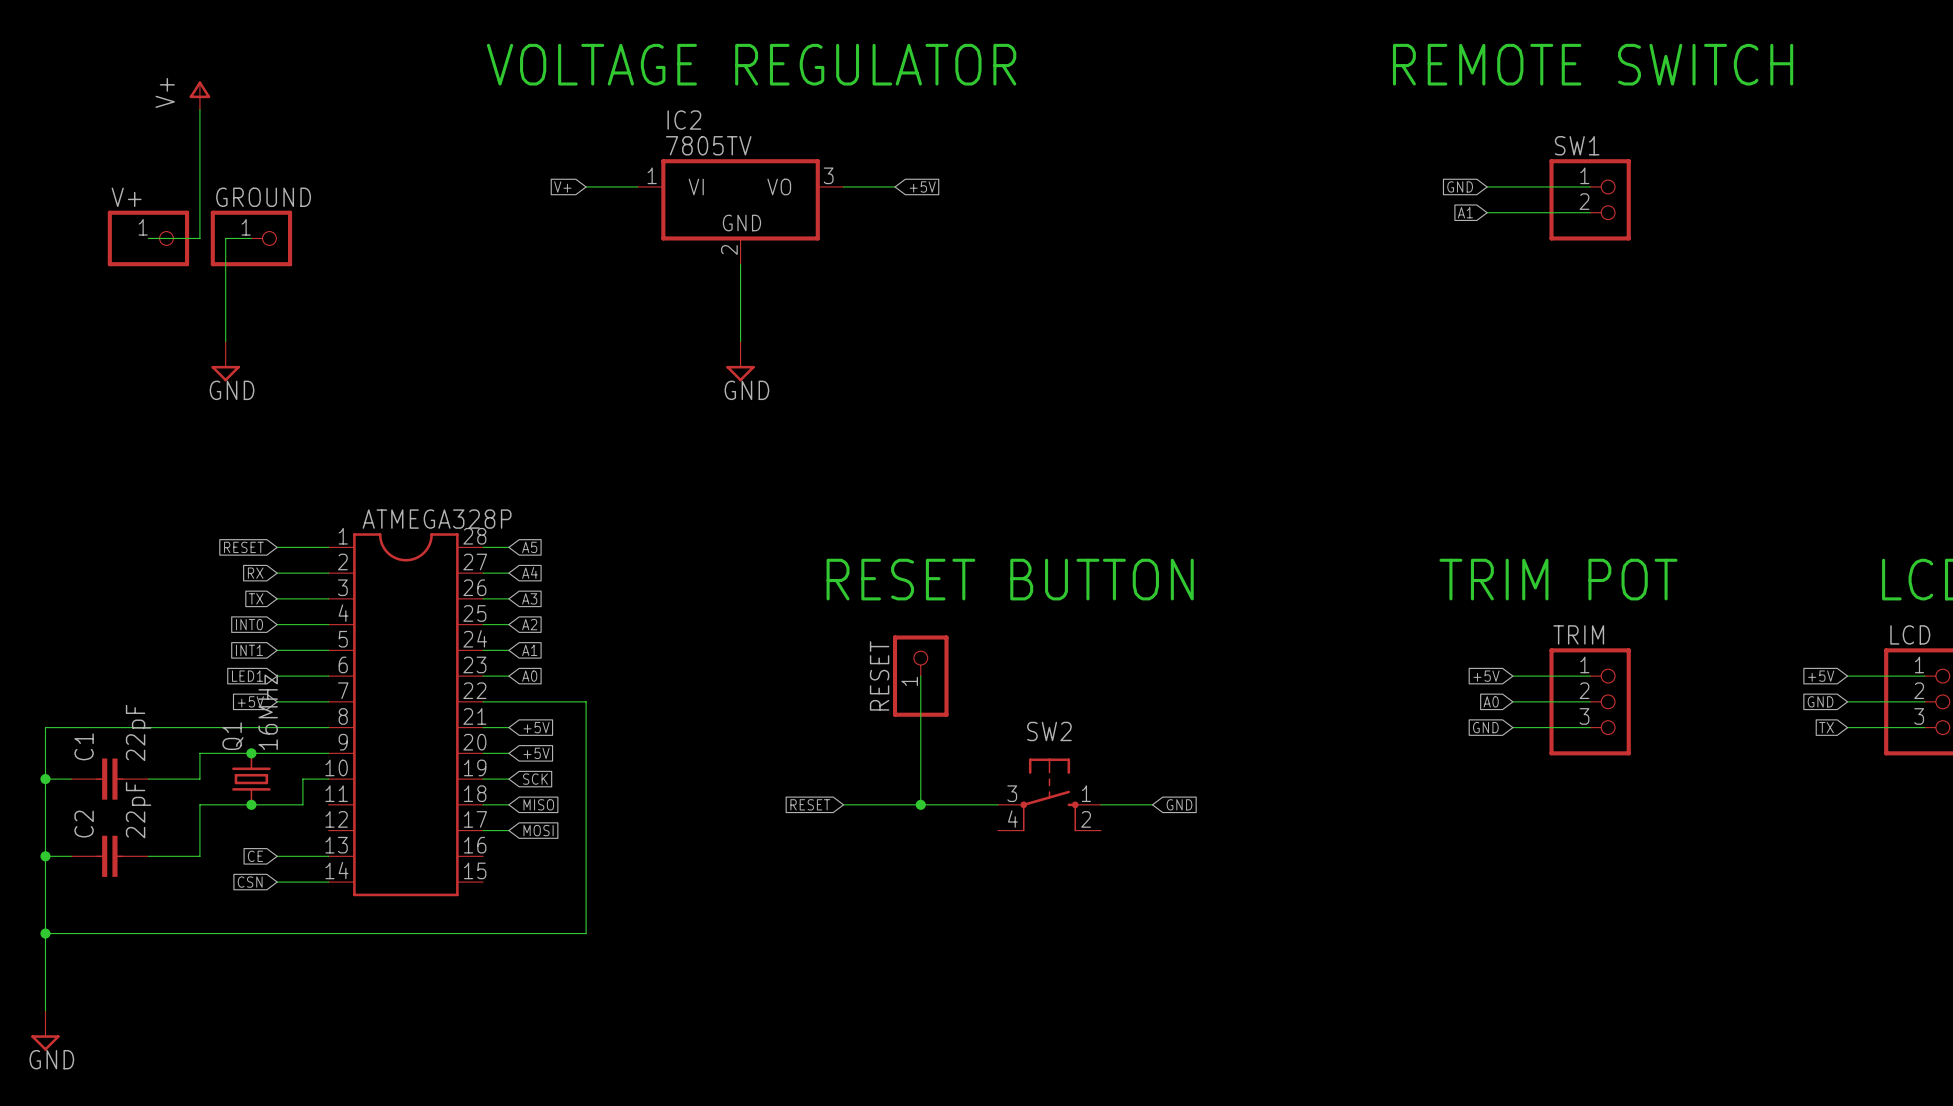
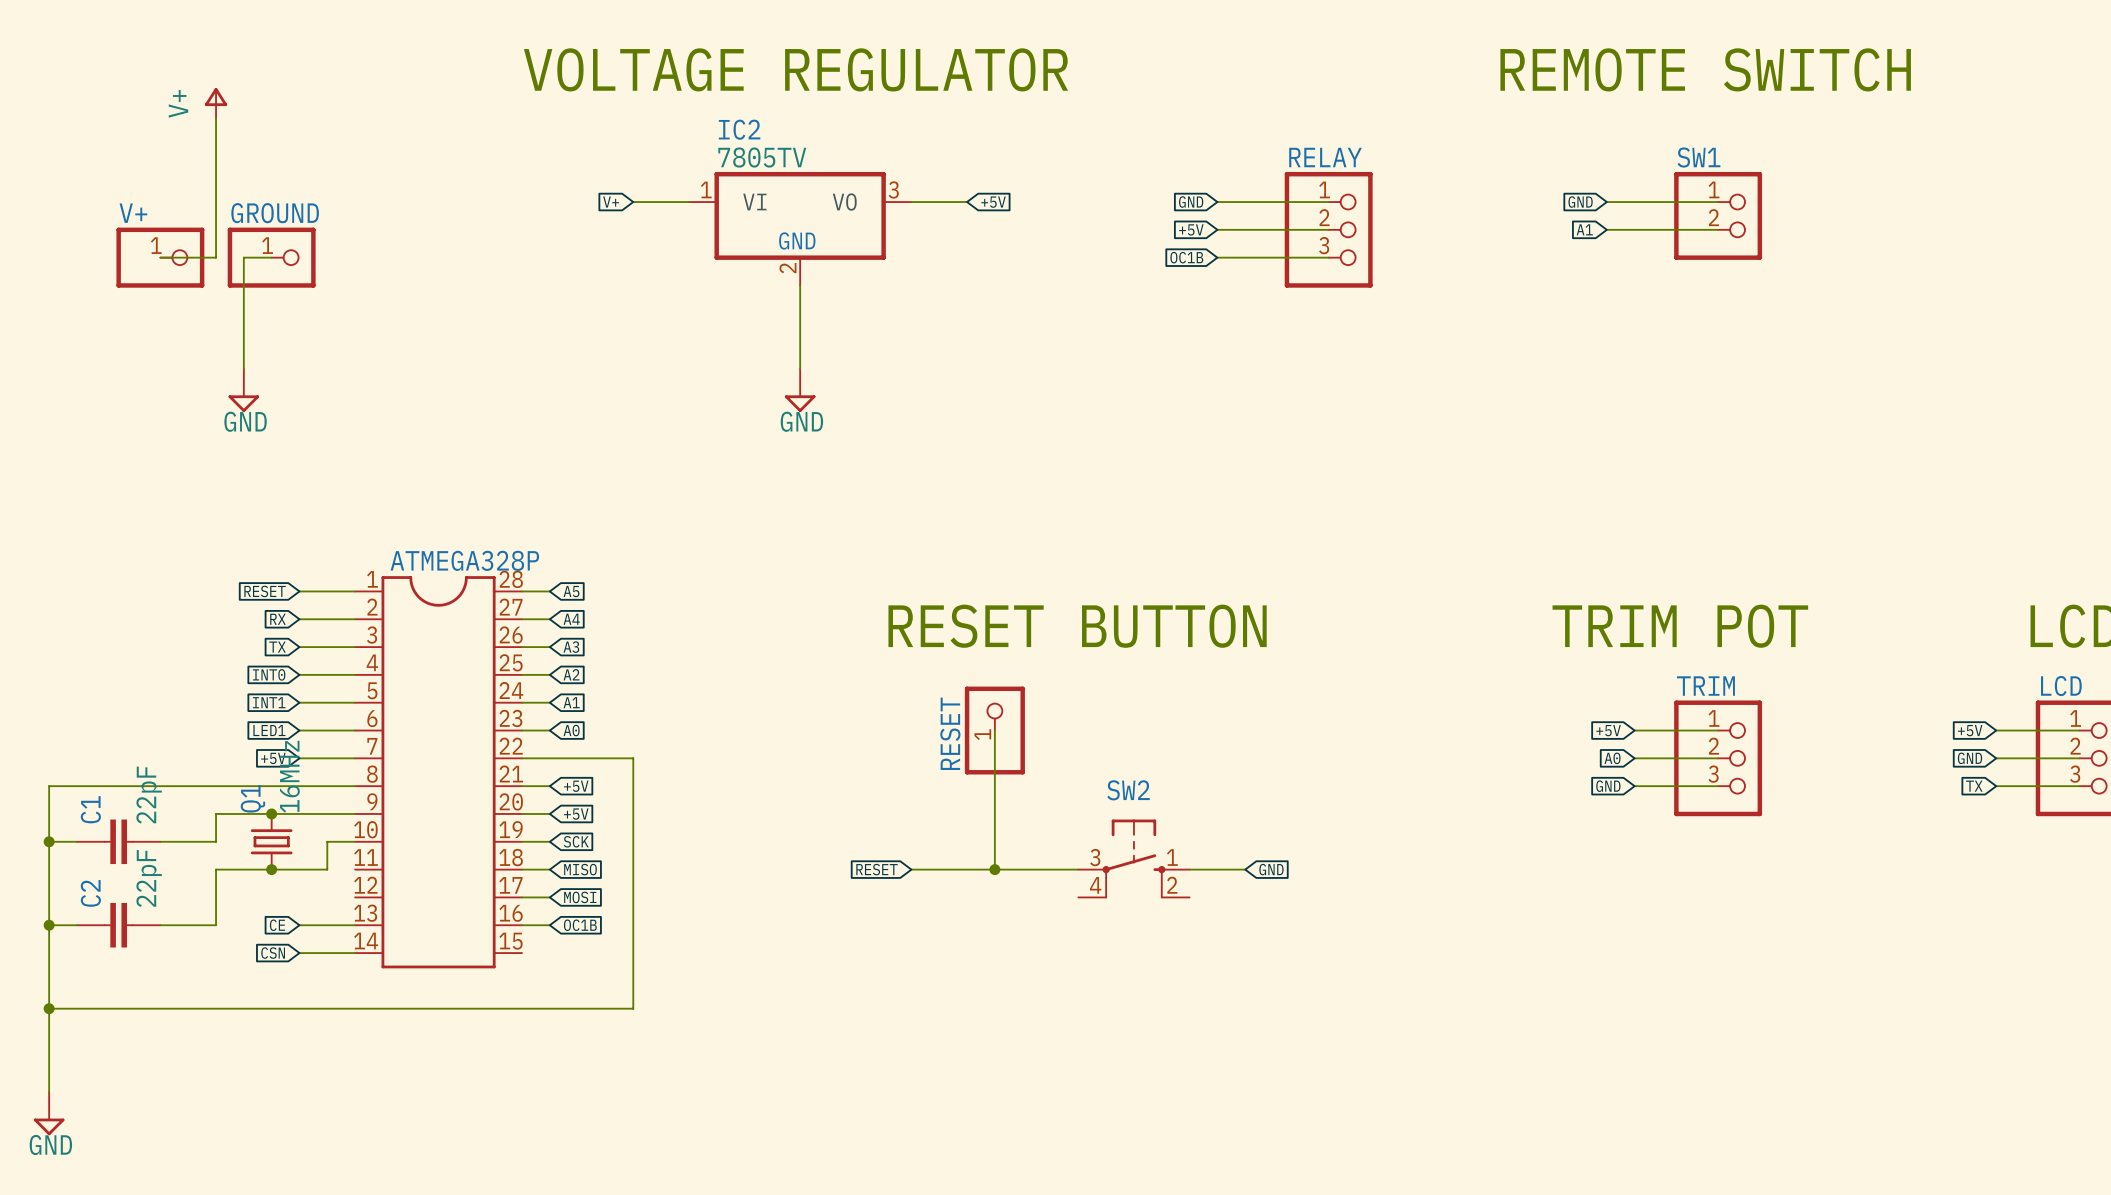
global label: none -> GND (1191, 202)
wire: none -> (1217, 202) (1328, 202)
global label: none -> +5V (1191, 229)
wire: none -> (1217, 229) (1328, 229)
RELAY: none -> (1328, 229)
global label: none -> OC1B (1186, 257)
wire: none -> (1217, 257) (1328, 257)
wire: none -> (522, 925) (549, 925)
global label: none -> OC1B (580, 925)

